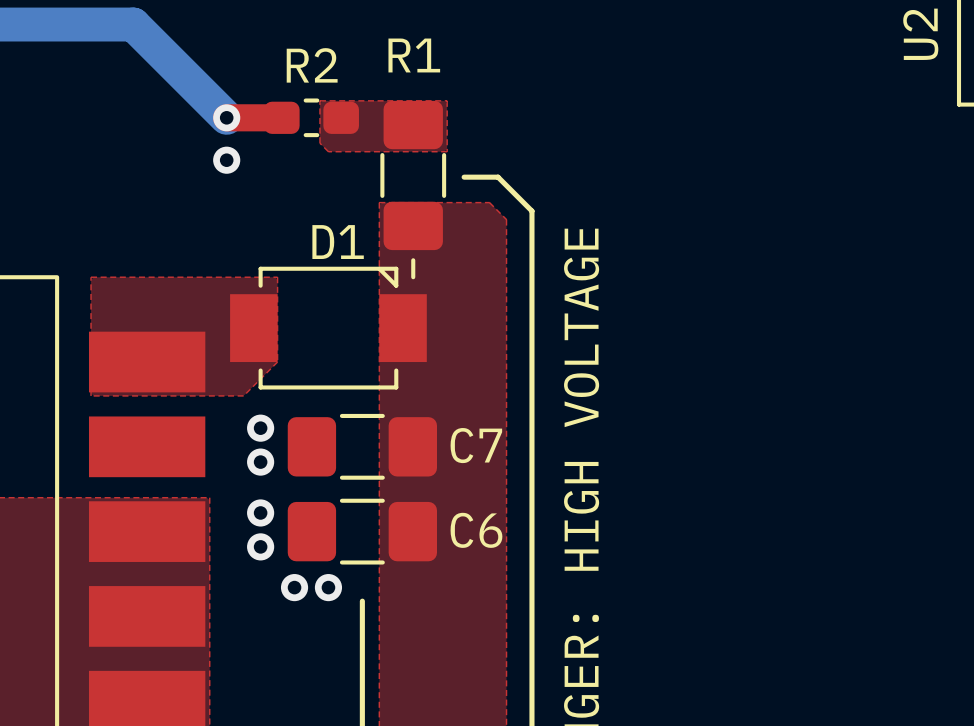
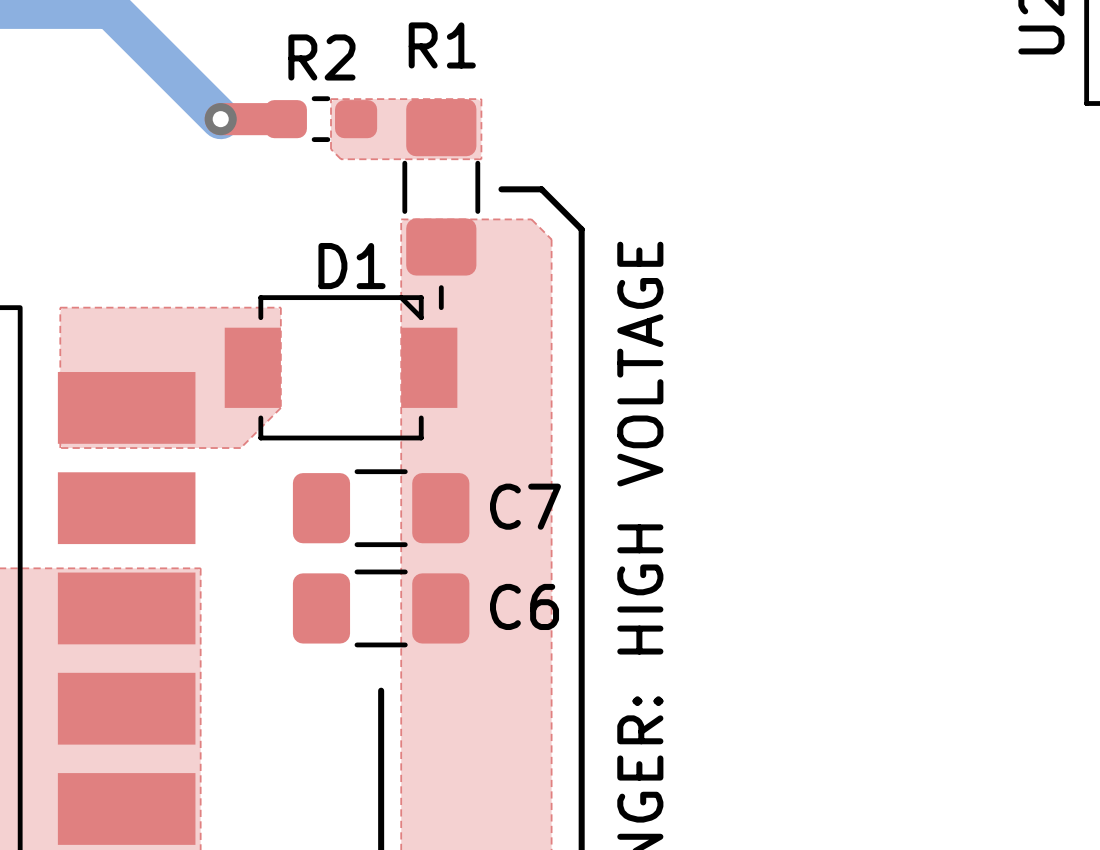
via: (226, 160) -> none
via: (260, 428) -> none
via: (260, 462) -> none
via: (260, 512) -> none
via: (260, 546) -> none
via: (294, 587) -> none
via: (328, 587) -> none

